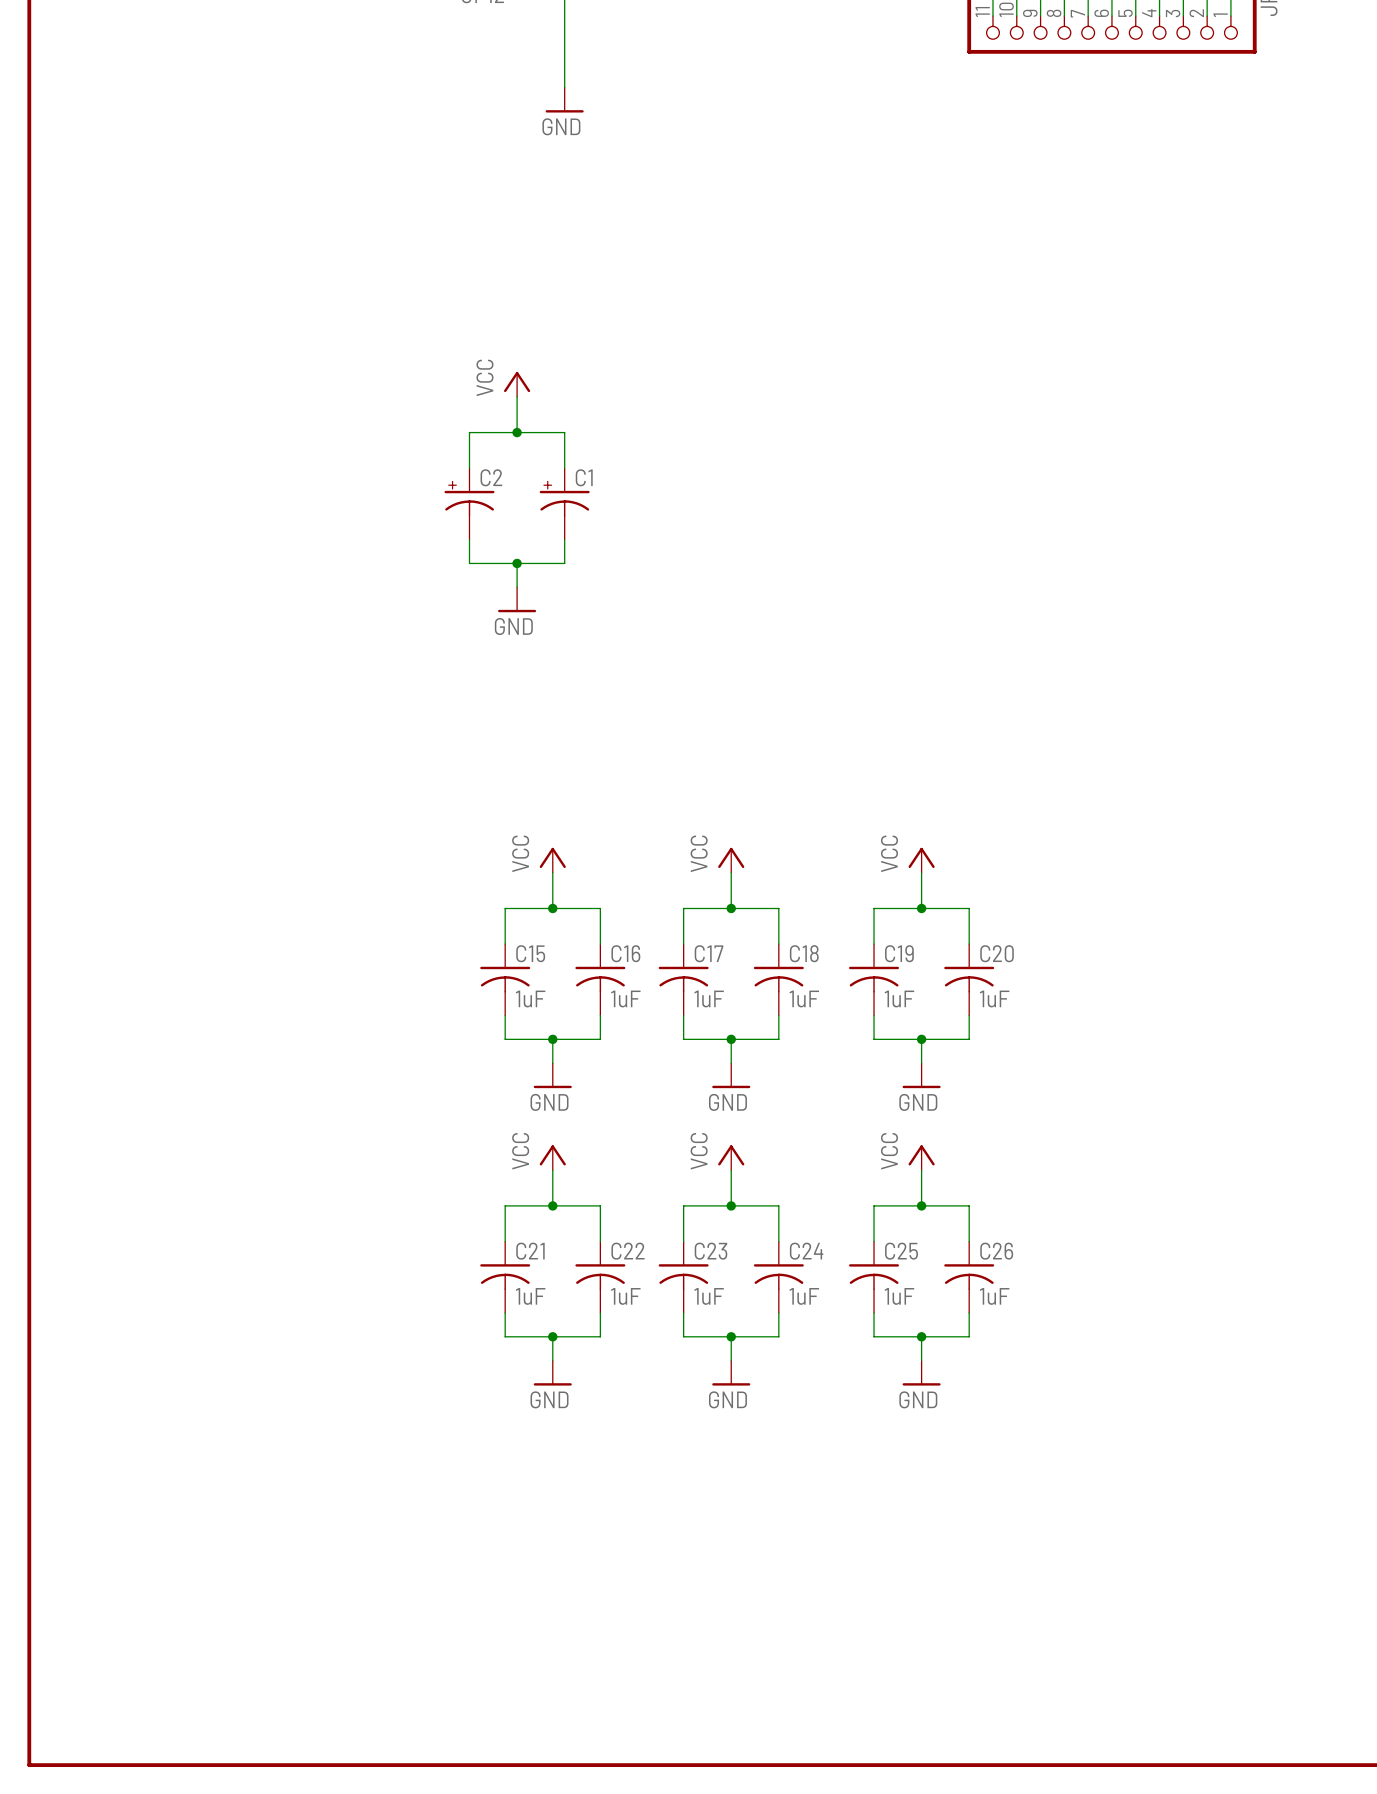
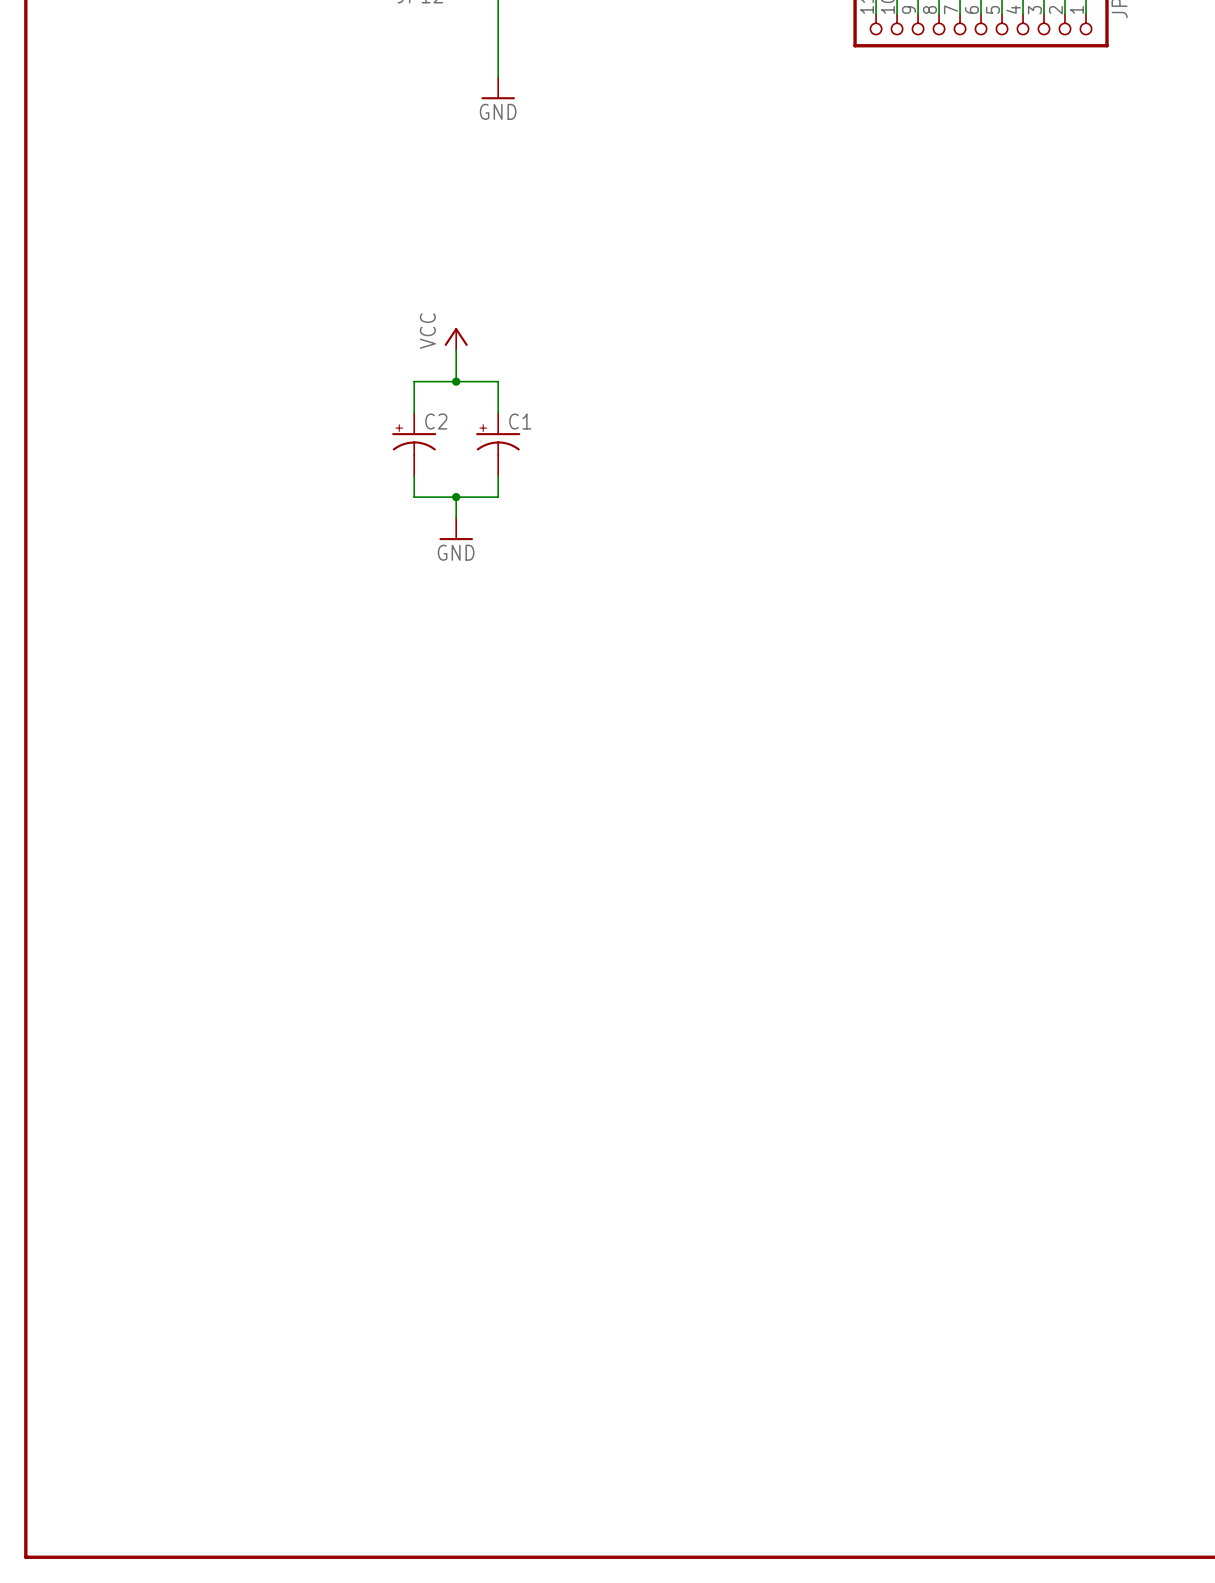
power symbol: VCC (552, 860) -> none
power symbol: VCC (731, 860) -> none
power symbol: VCC (921, 860) -> none
wire: (552, 872) (552, 908) -> none
wire: (731, 872) (731, 908) -> none
wire: (921, 872) (921, 908) -> none
junction: (552, 908) -> none
junction: (731, 908) -> none
junction: (921, 908) -> none
wire: (505, 944) (505, 908) (600, 908) (600, 944) -> none
wire: (683, 944) (683, 908) (778, 908) (778, 944) -> none
wire: (874, 944) (874, 908) (969, 908) (969, 944) -> none
C15: 1uF (505, 979) -> none
C16: 1uF (600, 979) -> none
C17: 1uF (683, 979) -> none
C18: 1uF (778, 979) -> none
C19: 1uF (874, 979) -> none
C20: 1uF (969, 979) -> none
wire: (505, 1015) (505, 1039) (600, 1039) (600, 1015) -> none
wire: (683, 1015) (683, 1039) (778, 1039) (778, 1015) -> none
wire: (874, 1015) (874, 1039) (969, 1039) (969, 1015) -> none
wire: (552, 1039) (552, 1063) -> none
junction: (552, 1039) -> none
wire: (731, 1039) (731, 1063) -> none
junction: (731, 1039) -> none
wire: (921, 1039) (921, 1063) -> none
junction: (921, 1039) -> none
power symbol: GND (552, 1075) -> none
power symbol: GND (731, 1075) -> none
power symbol: GND (921, 1075) -> none
power symbol: VCC (552, 1157) -> none
power symbol: VCC (731, 1157) -> none
power symbol: VCC (921, 1157) -> none
wire: (552, 1170) (552, 1205) -> none
wire: (731, 1170) (731, 1205) -> none
wire: (921, 1170) (921, 1205) -> none
junction: (552, 1205) -> none
junction: (731, 1205) -> none
junction: (921, 1205) -> none
wire: (505, 1241) (505, 1205) (600, 1205) (600, 1241) -> none
wire: (683, 1241) (683, 1205) (778, 1205) (778, 1241) -> none
wire: (874, 1241) (874, 1205) (969, 1205) (969, 1241) -> none
C21: 1uF (505, 1277) -> none
C22: 1uF (600, 1277) -> none
C23: 1uF (683, 1277) -> none
C24: 1uF (778, 1277) -> none
C25: 1uF (874, 1277) -> none
C26: 1uF (969, 1277) -> none
wire: (505, 1313) (505, 1336) (600, 1336) (600, 1313) -> none
wire: (683, 1313) (683, 1336) (778, 1336) (778, 1313) -> none
wire: (874, 1313) (874, 1336) (969, 1336) (969, 1313) -> none
wire: (552, 1336) (552, 1360) -> none
junction: (552, 1336) -> none
wire: (731, 1336) (731, 1360) -> none
junction: (731, 1336) -> none
wire: (921, 1336) (921, 1360) -> none
junction: (921, 1336) -> none
power symbol: GND (552, 1373) -> none
power symbol: GND (731, 1373) -> none
power symbol: GND (921, 1373) -> none

